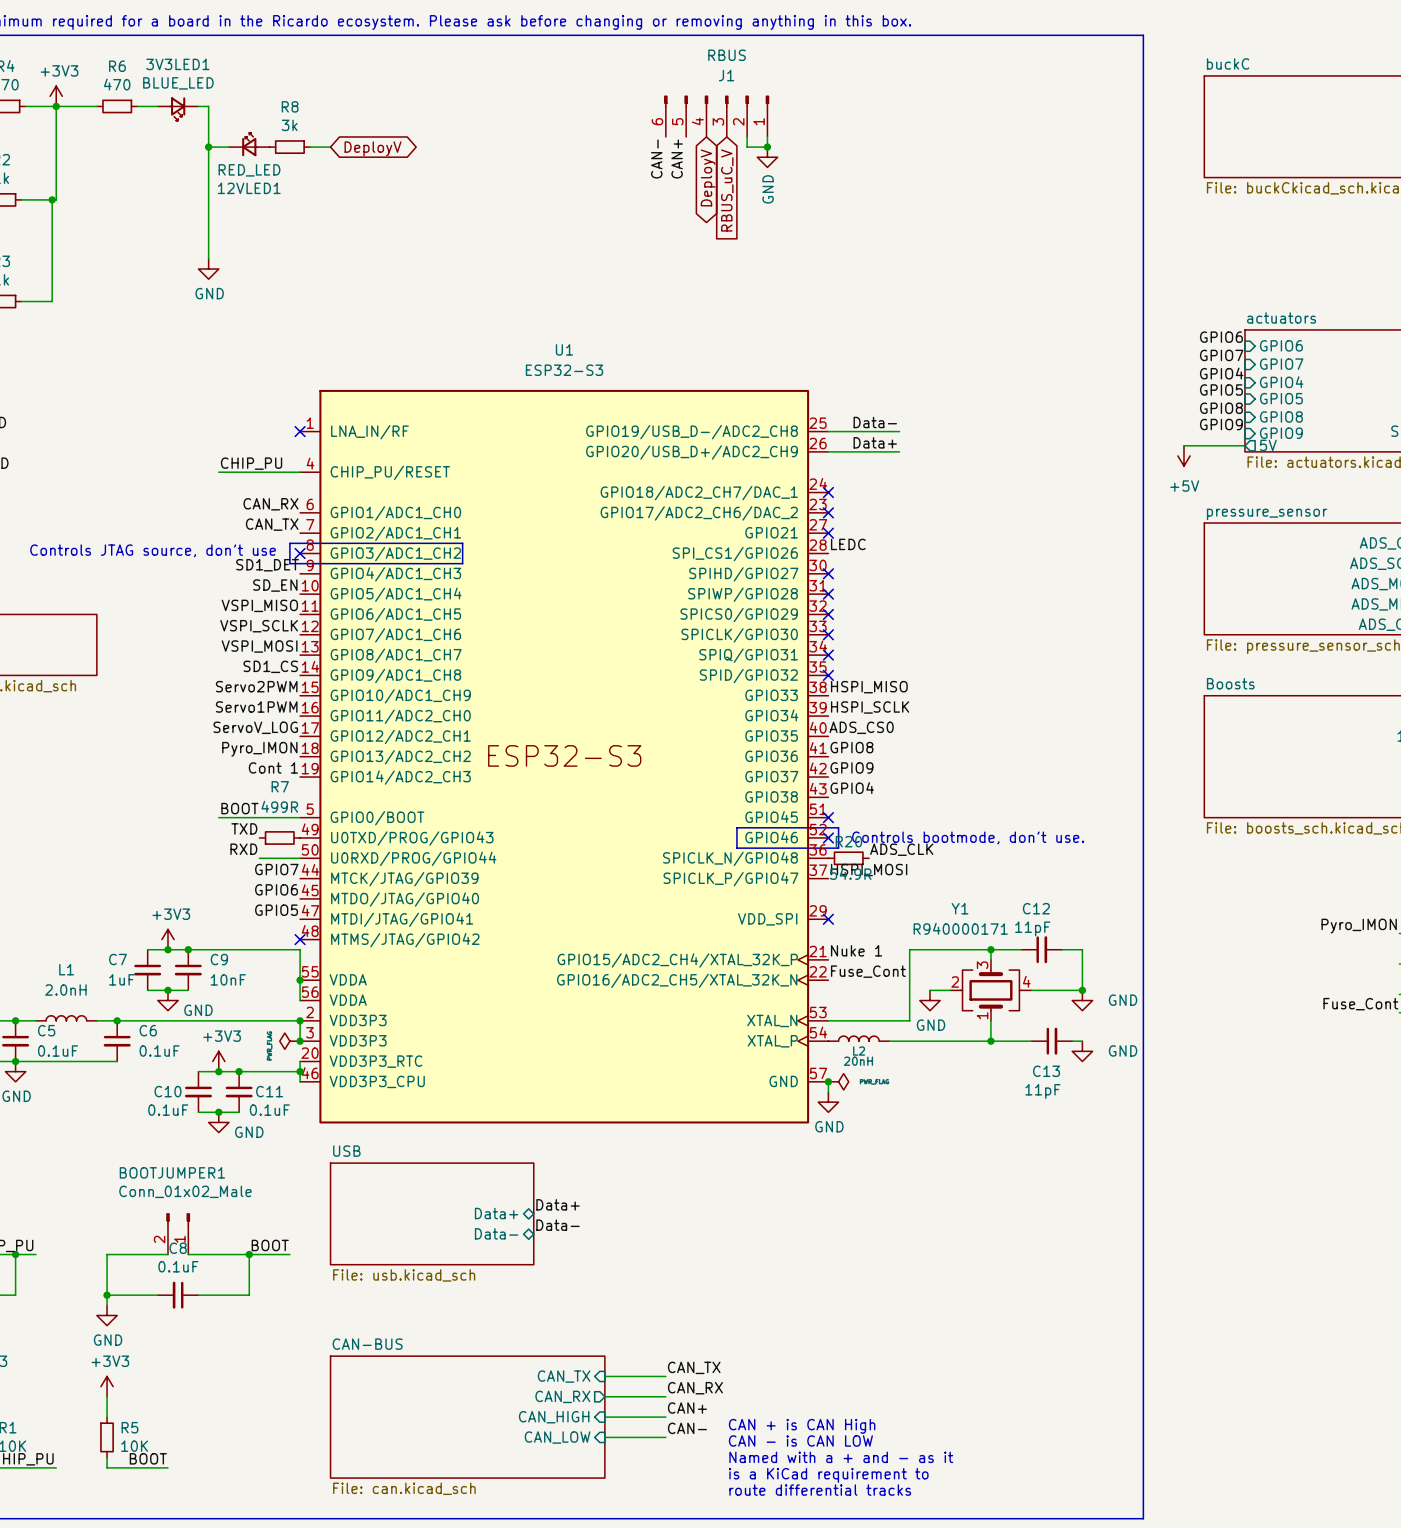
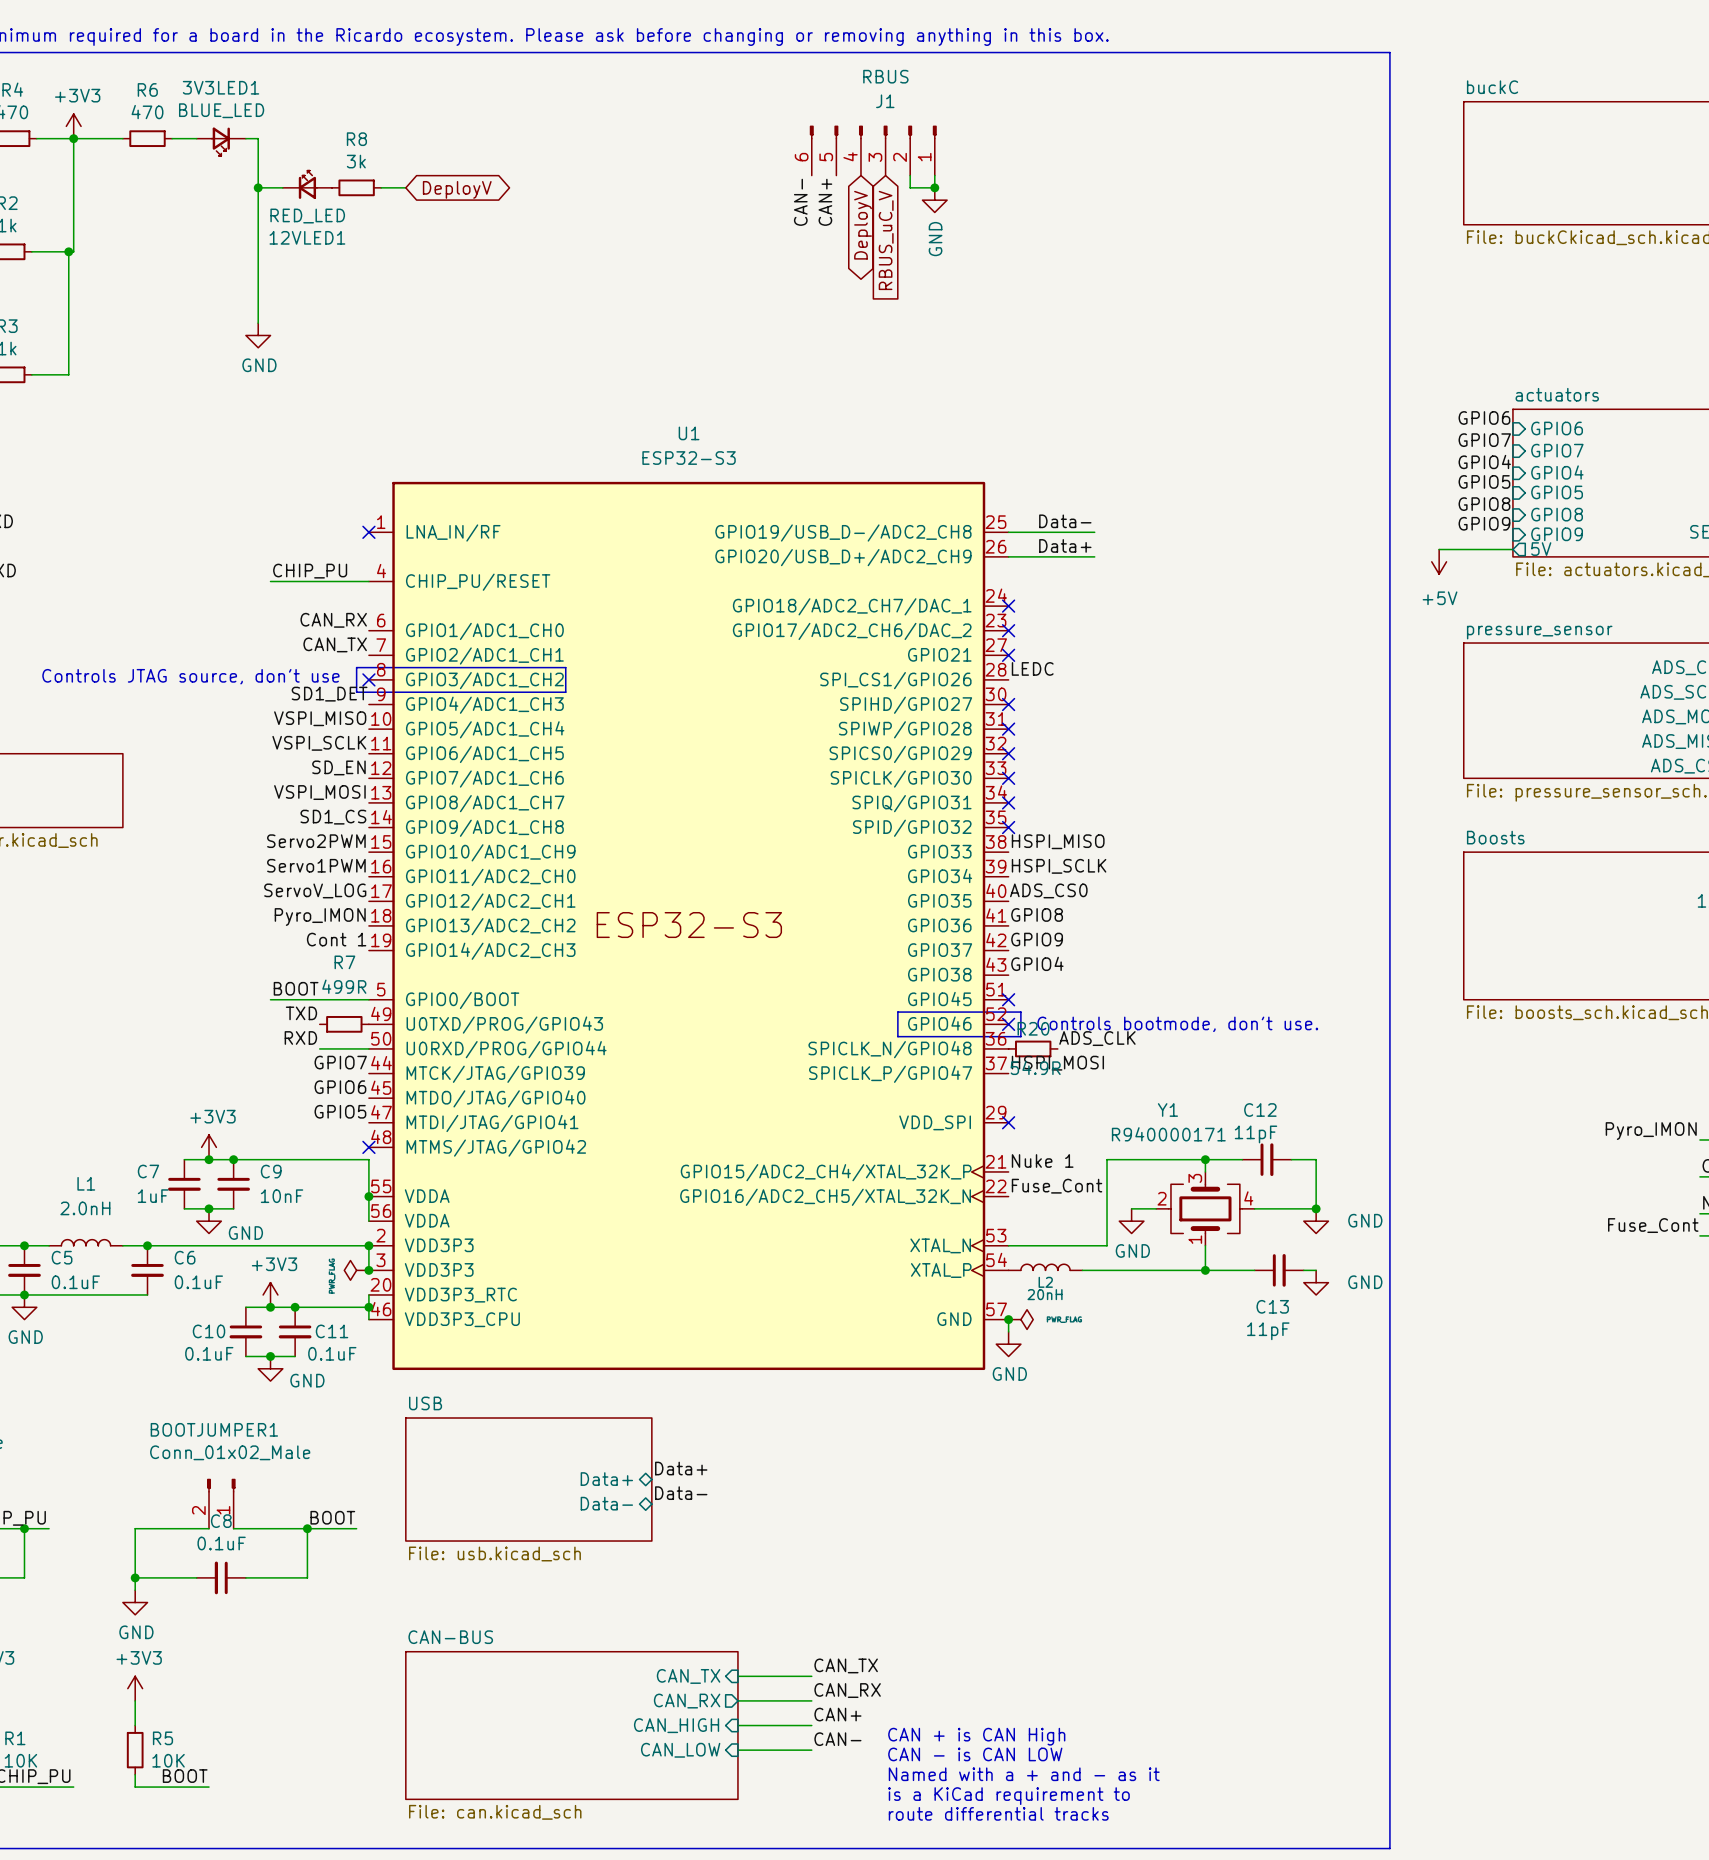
label: SD_EN (275, 585) -> VSPI_MISO (320, 718)
label: VSPI_MISO (259, 605) -> VSPI_SCLK (319, 743)
label: VSPI_SCLK (259, 626) -> SD_EN (338, 767)

